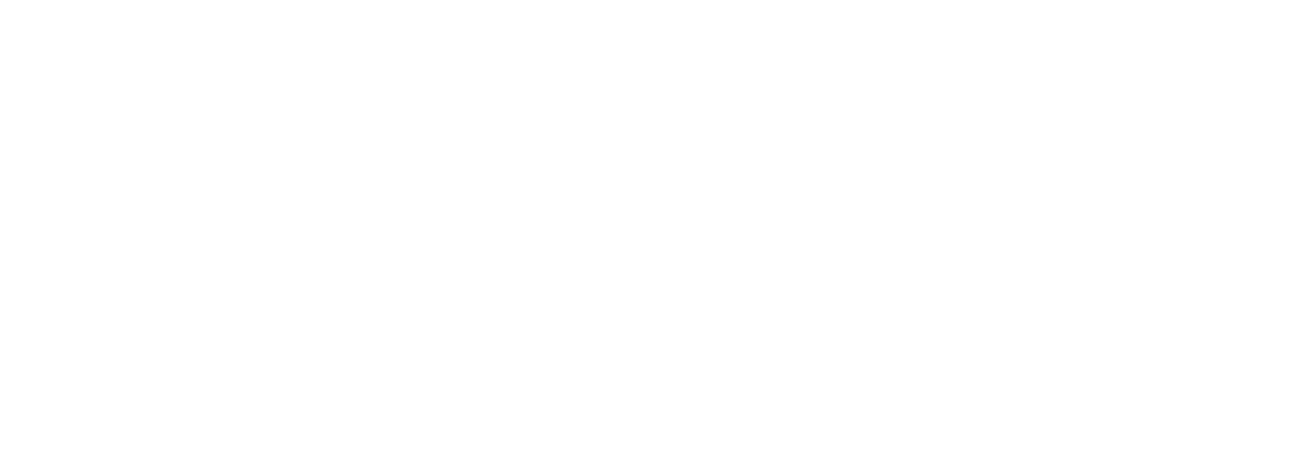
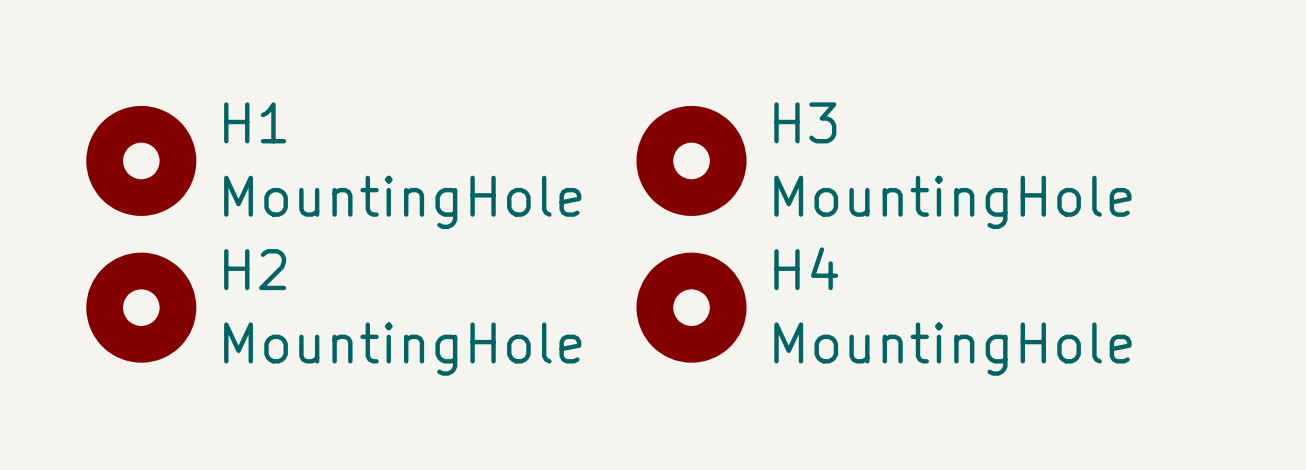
H1: none -> MountingHole (141, 160)
H3: none -> MountingHole (691, 160)
H2: none -> MountingHole (141, 307)
H4: none -> MountingHole (691, 307)

